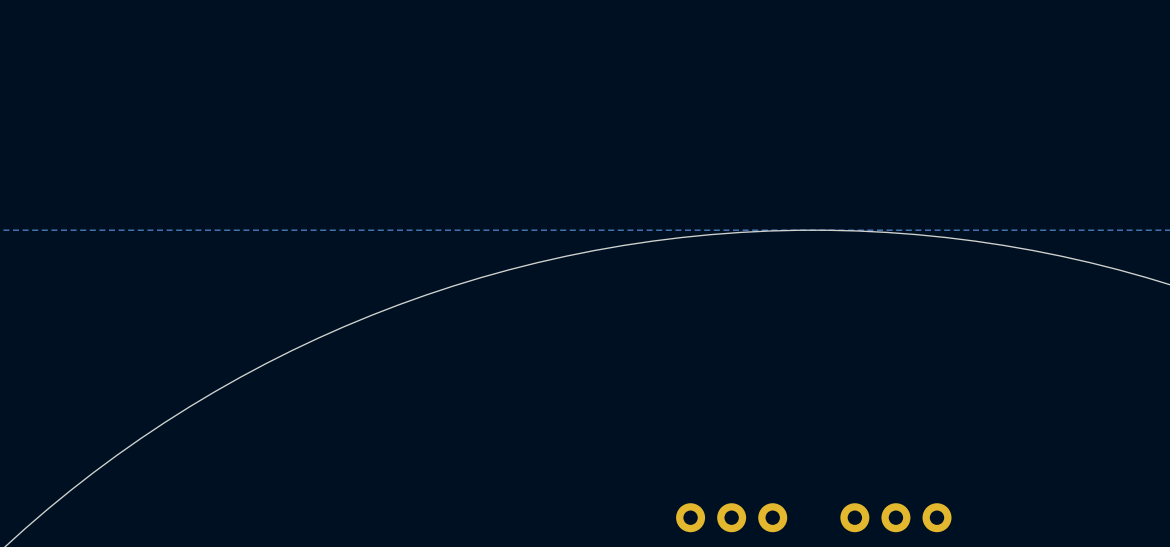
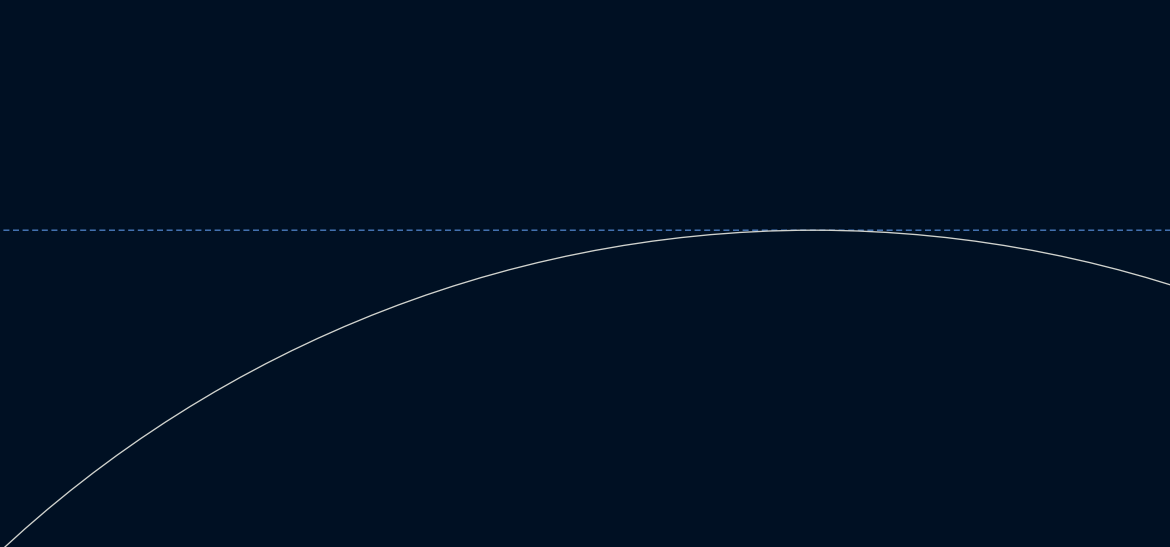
part: (731, 517) -> none
part: (895, 517) -> none

